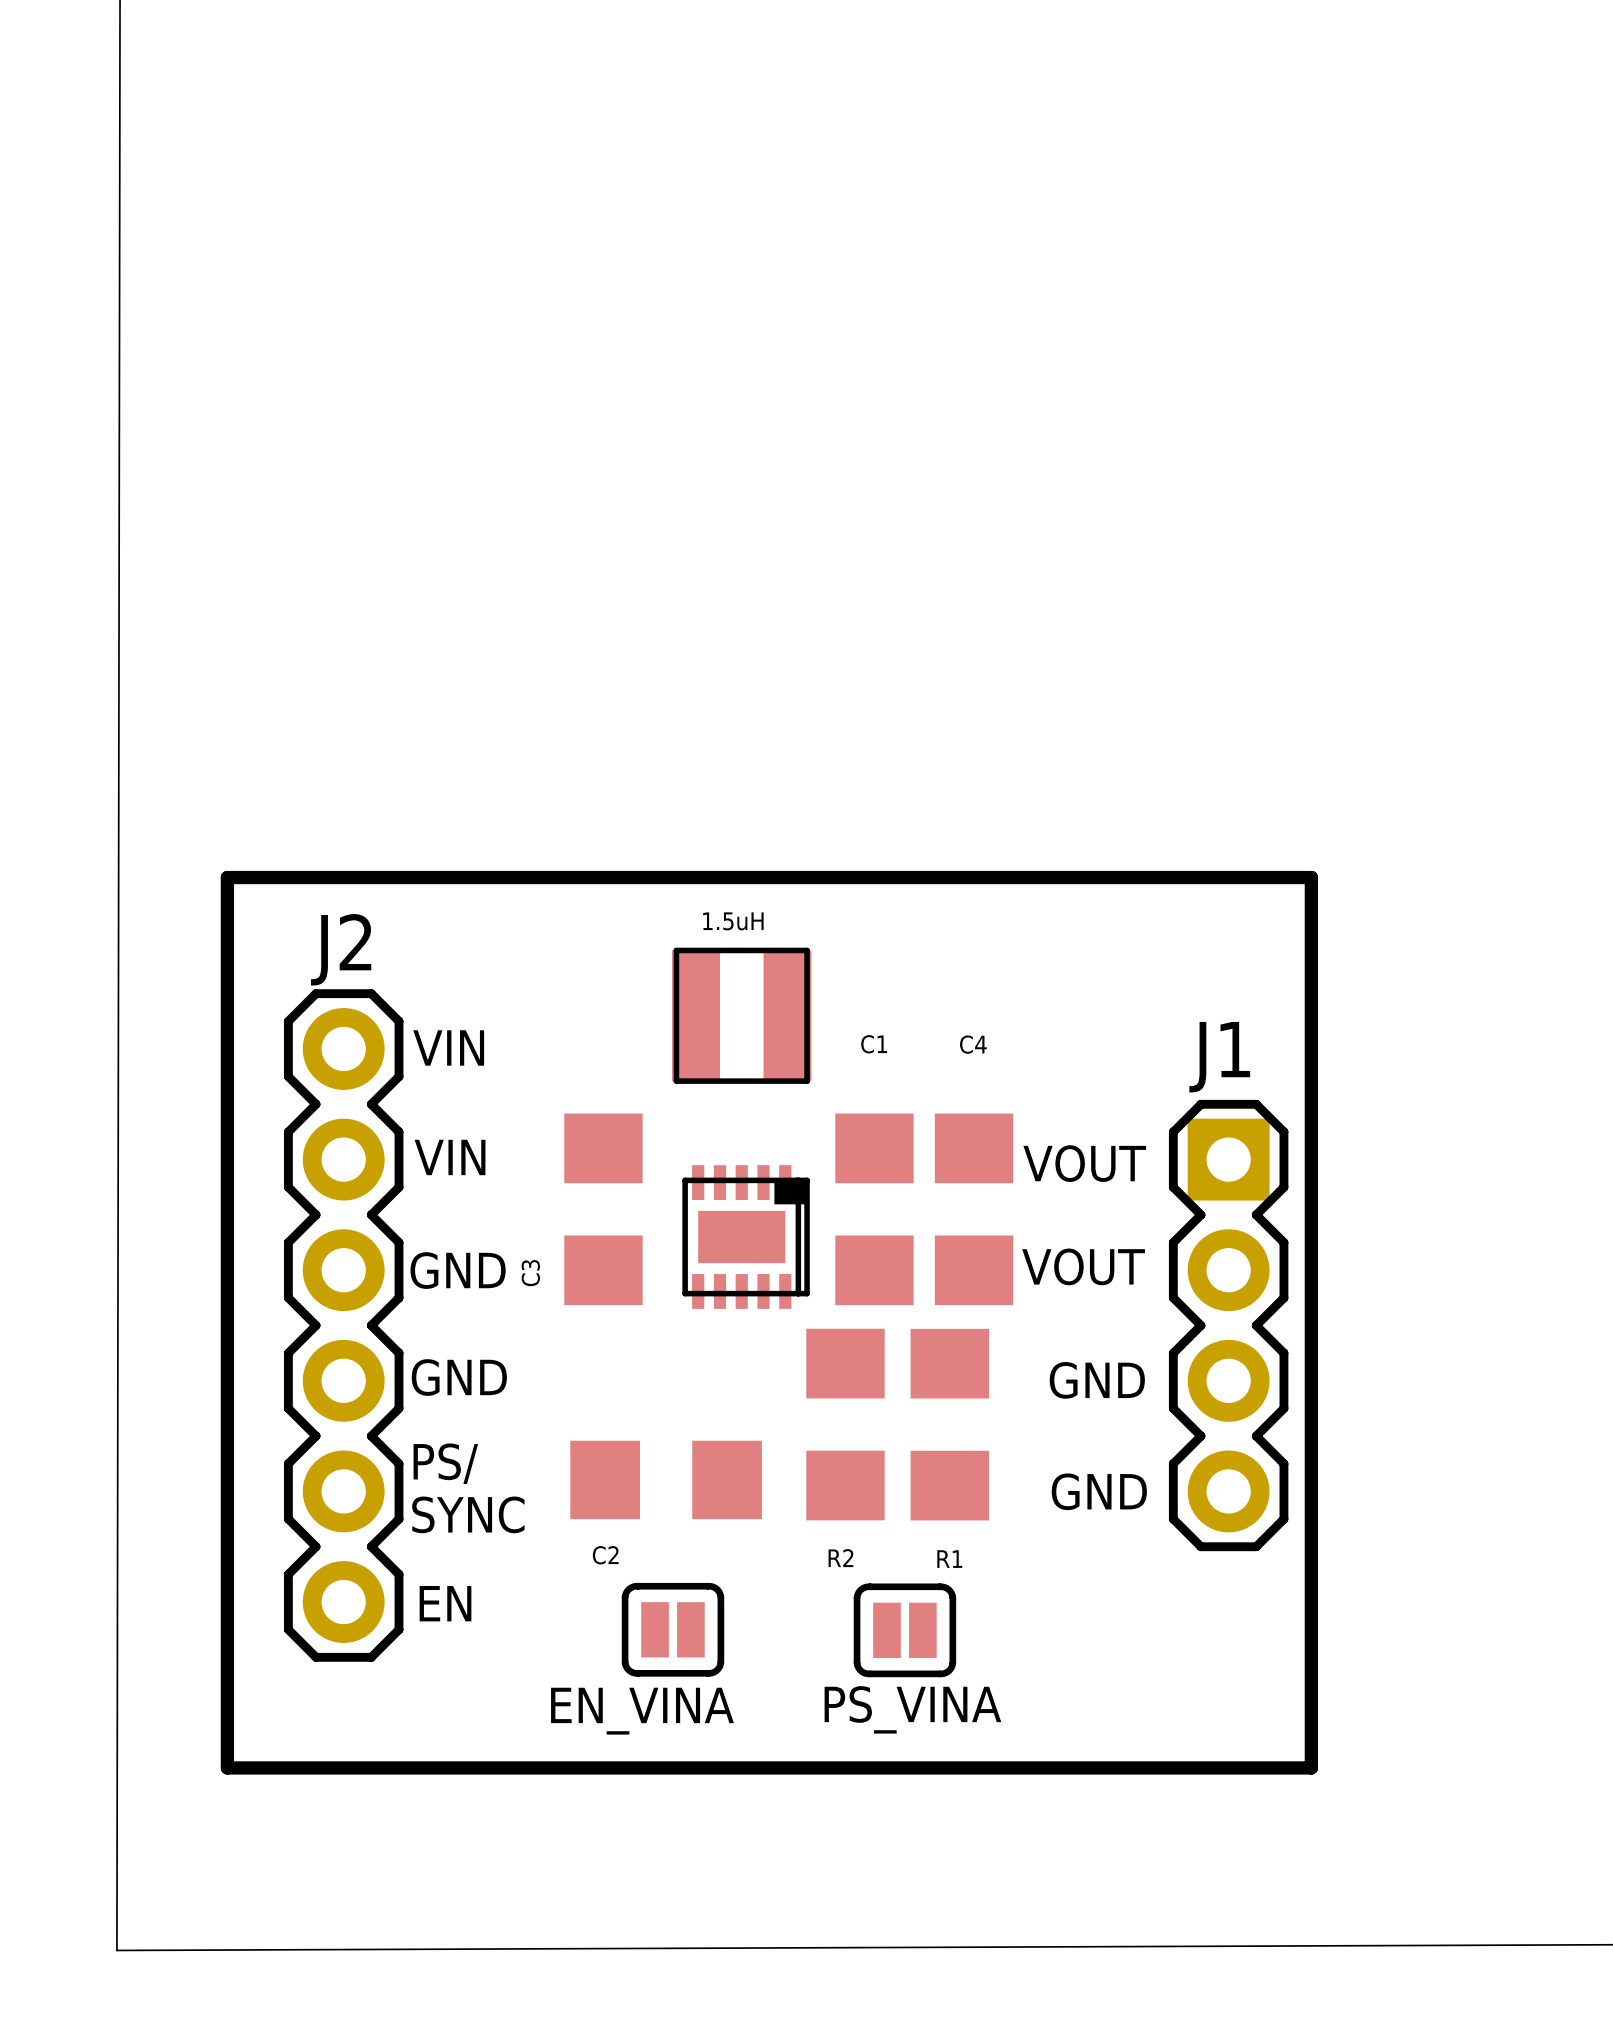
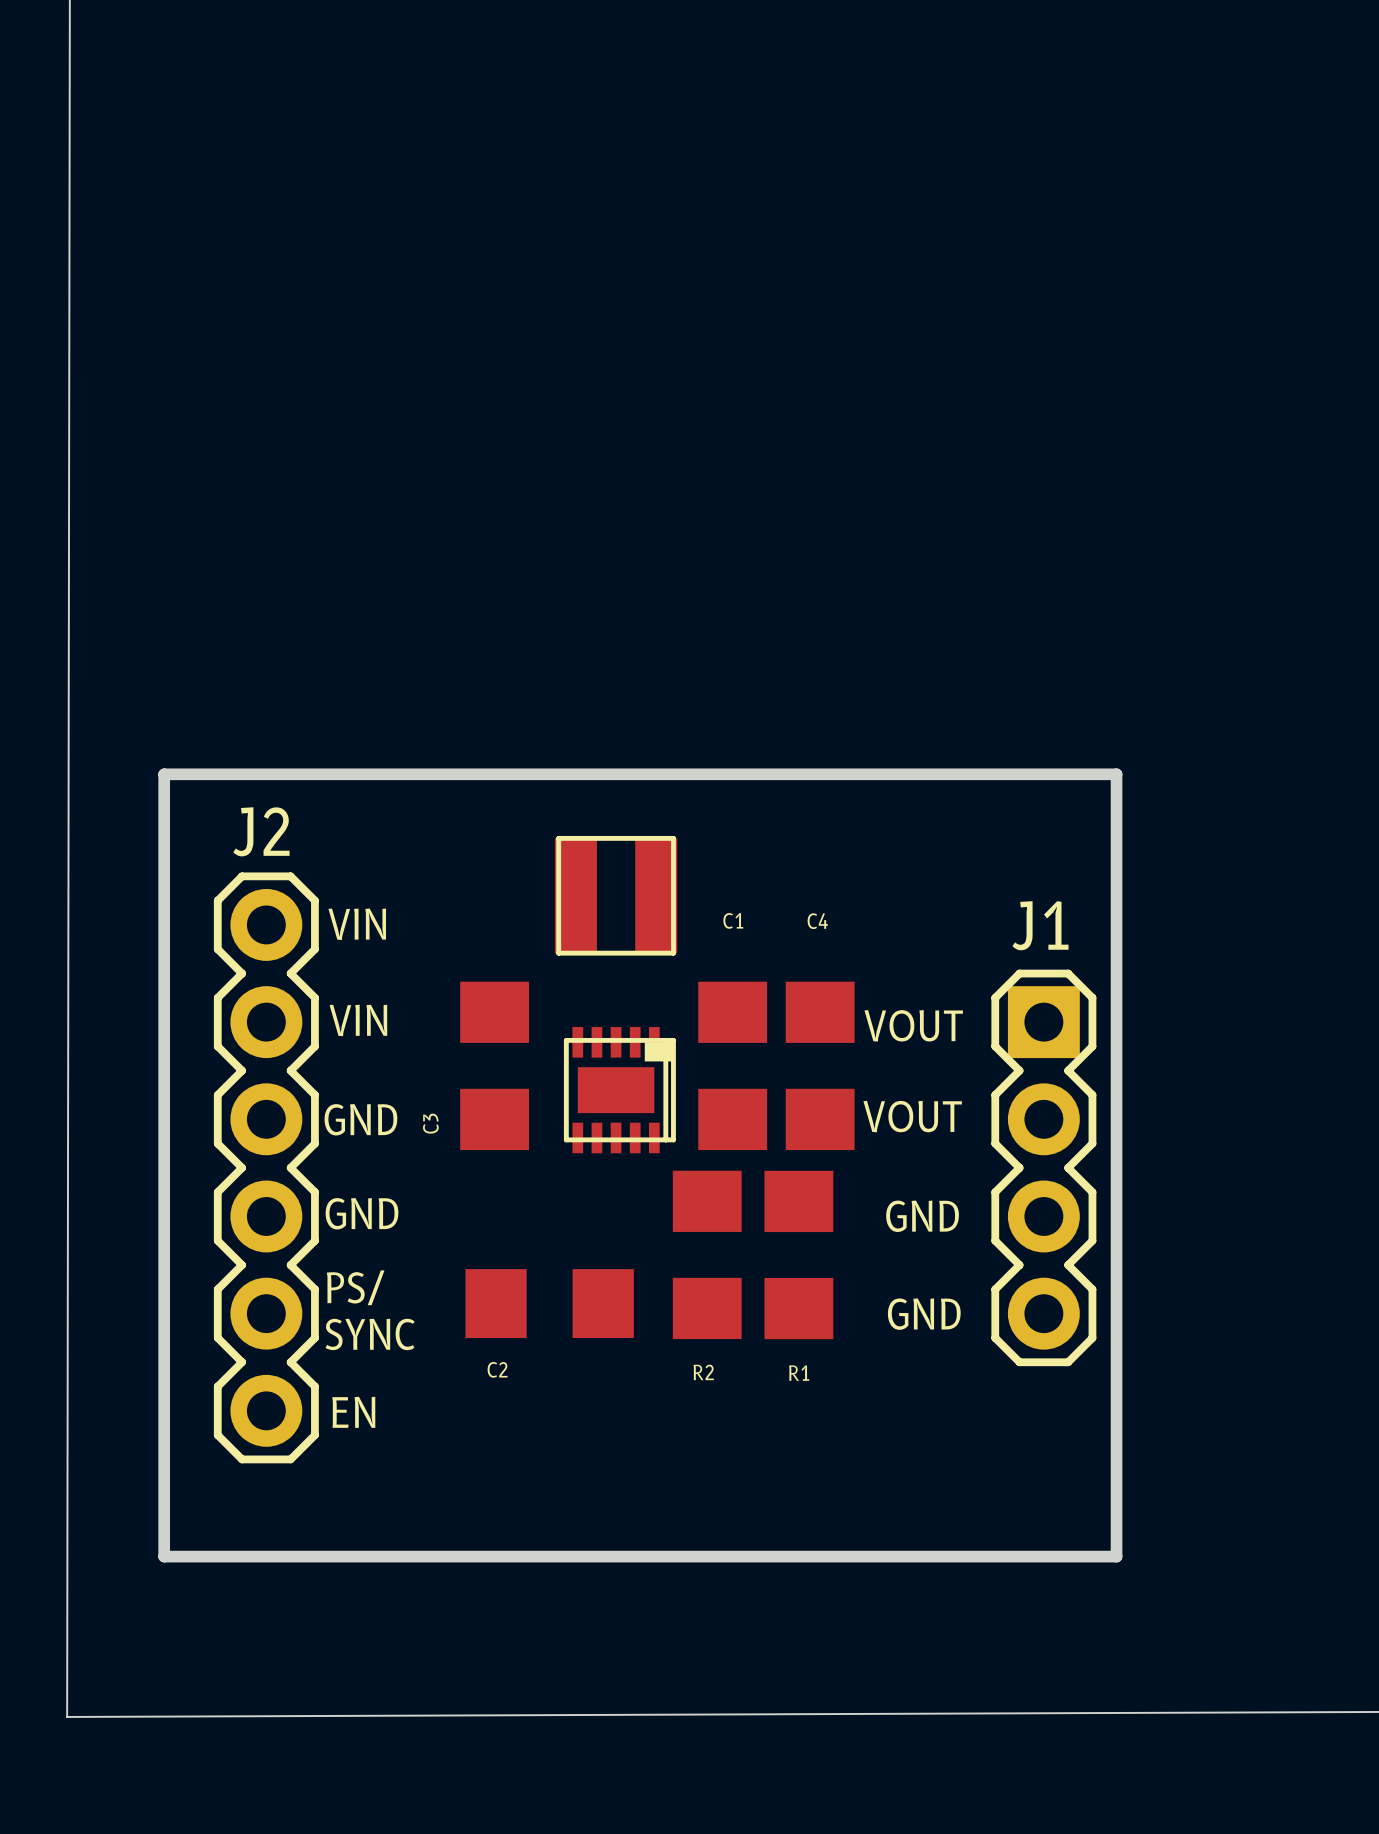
text: 1.5uH (733, 921) -> none
part: (672, 1629) -> none
part: (904, 1630) -> none
text: PS_VINA (912, 1709) -> none
text: EN_VINA (642, 1711) -> none

